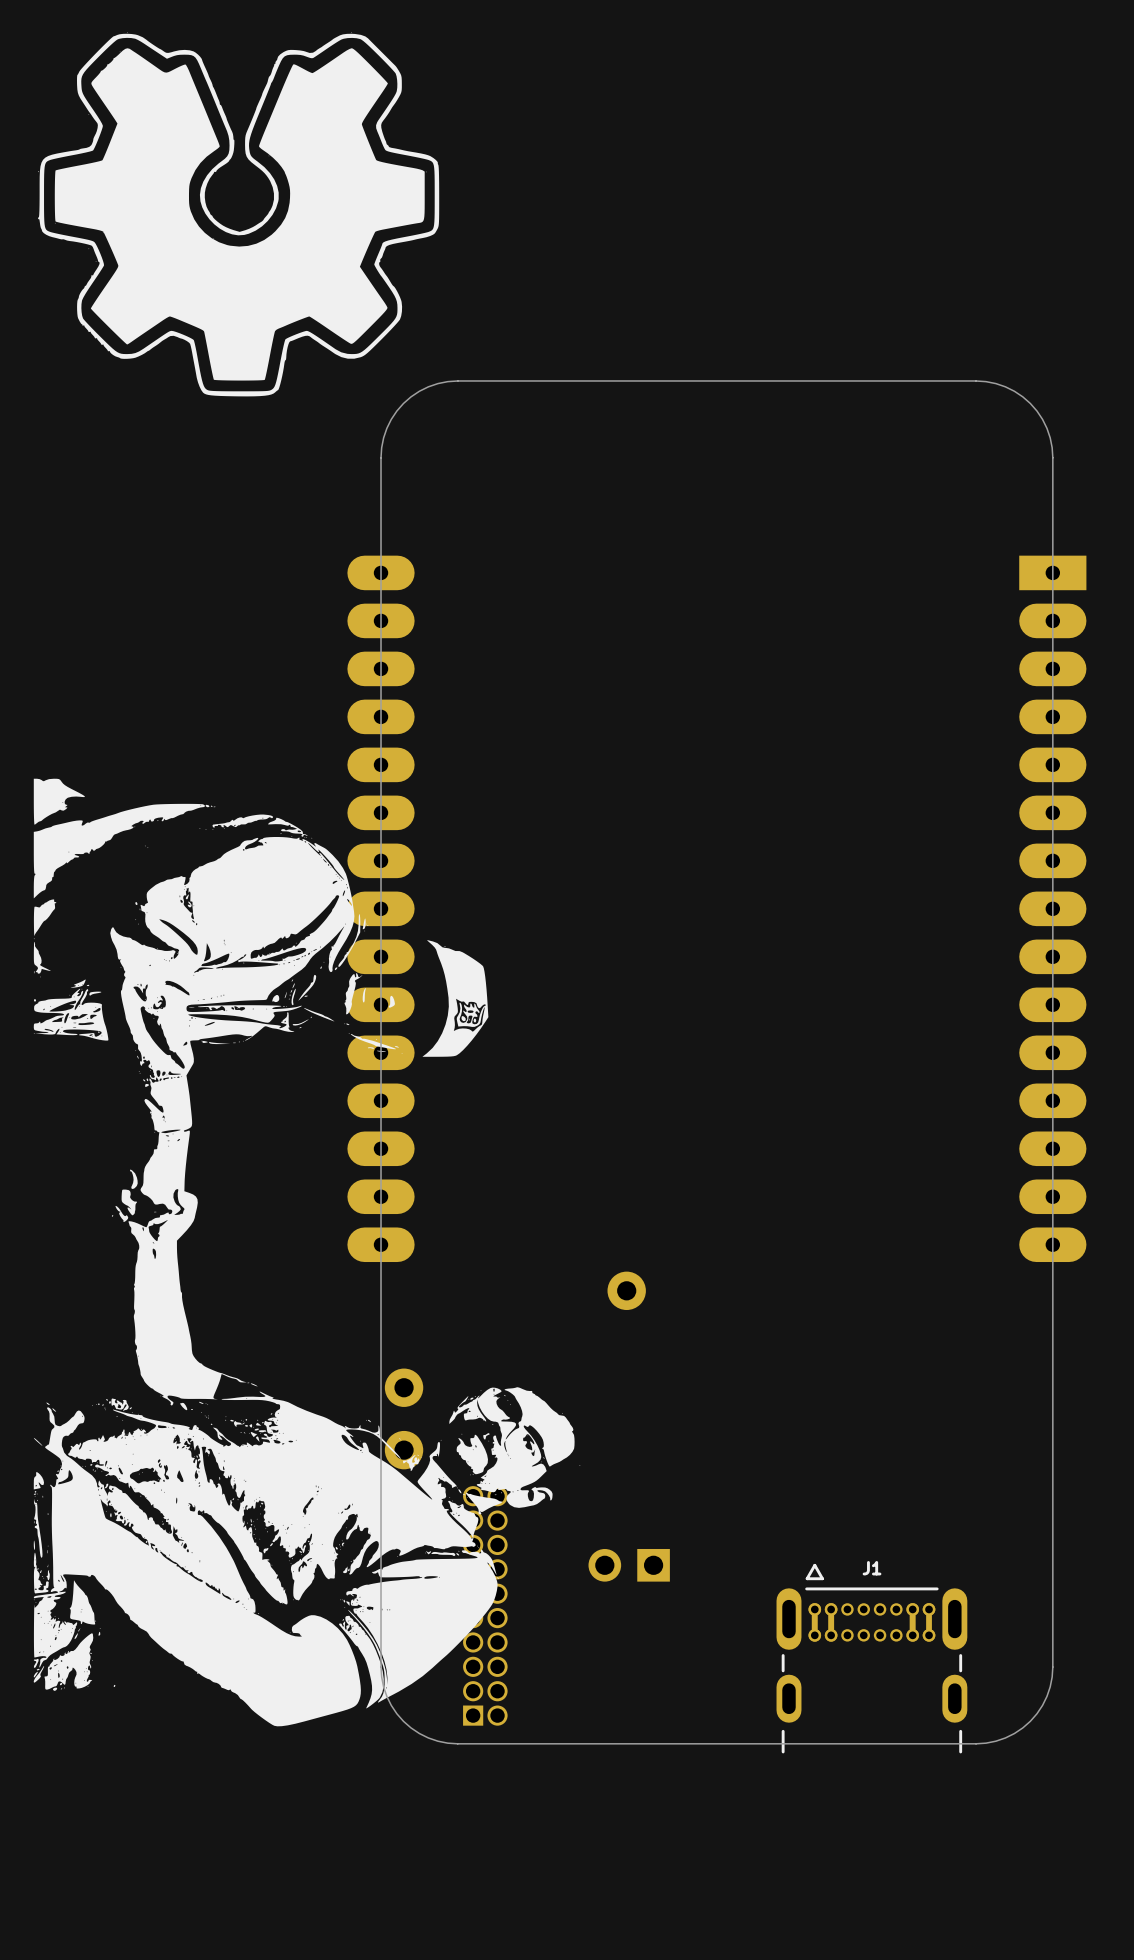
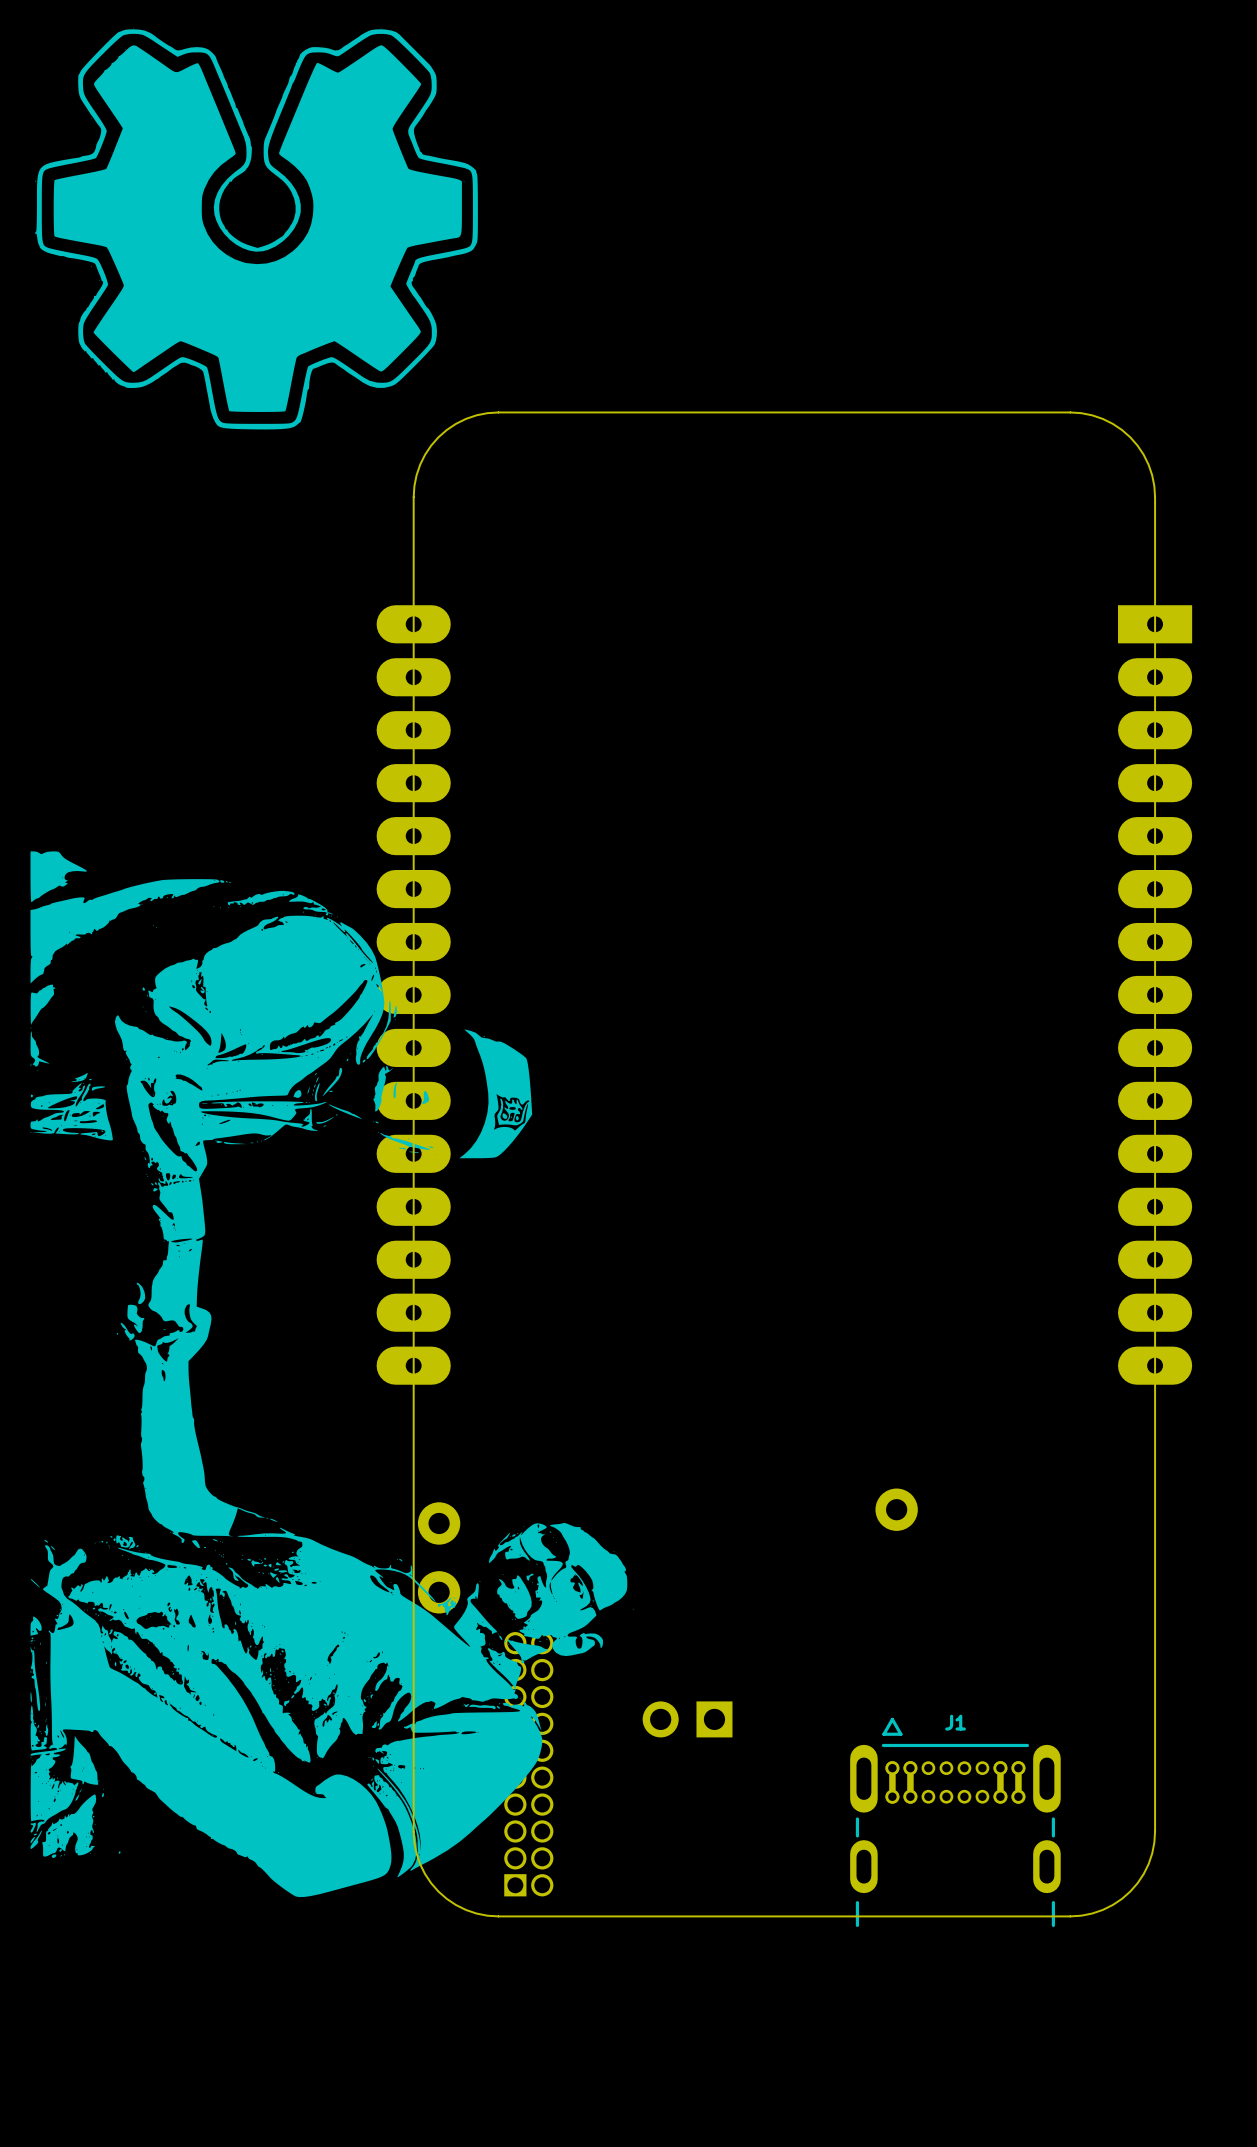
part position: (626, 1290) -> (896, 1509)

